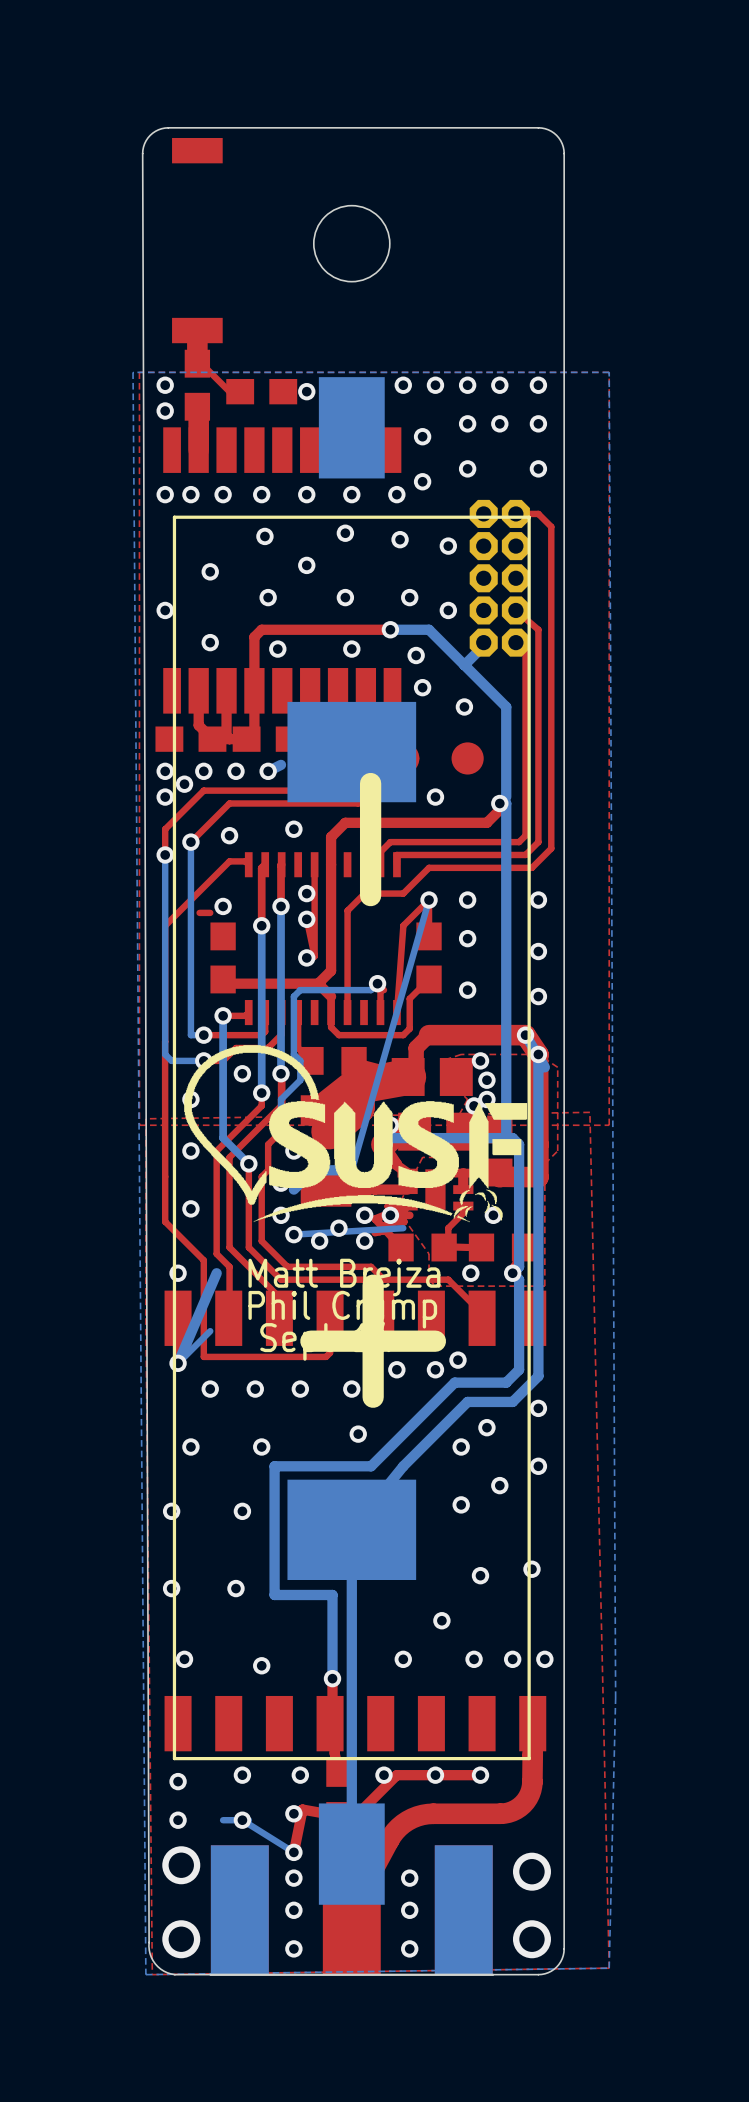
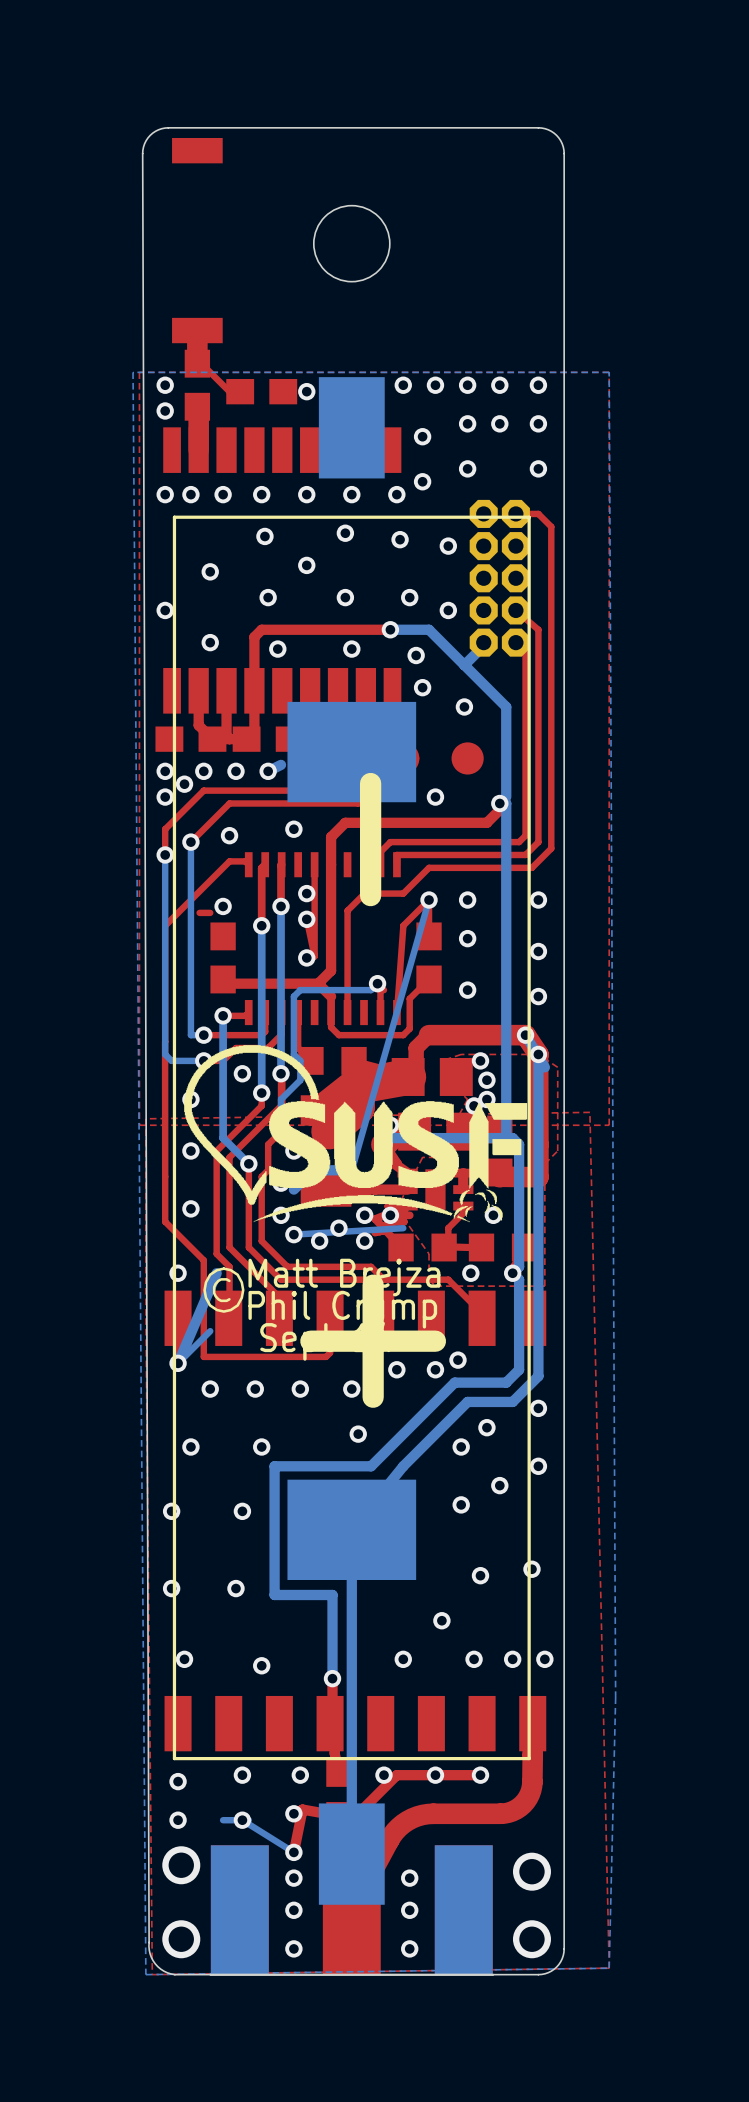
text: none -> © (223, 1290)

